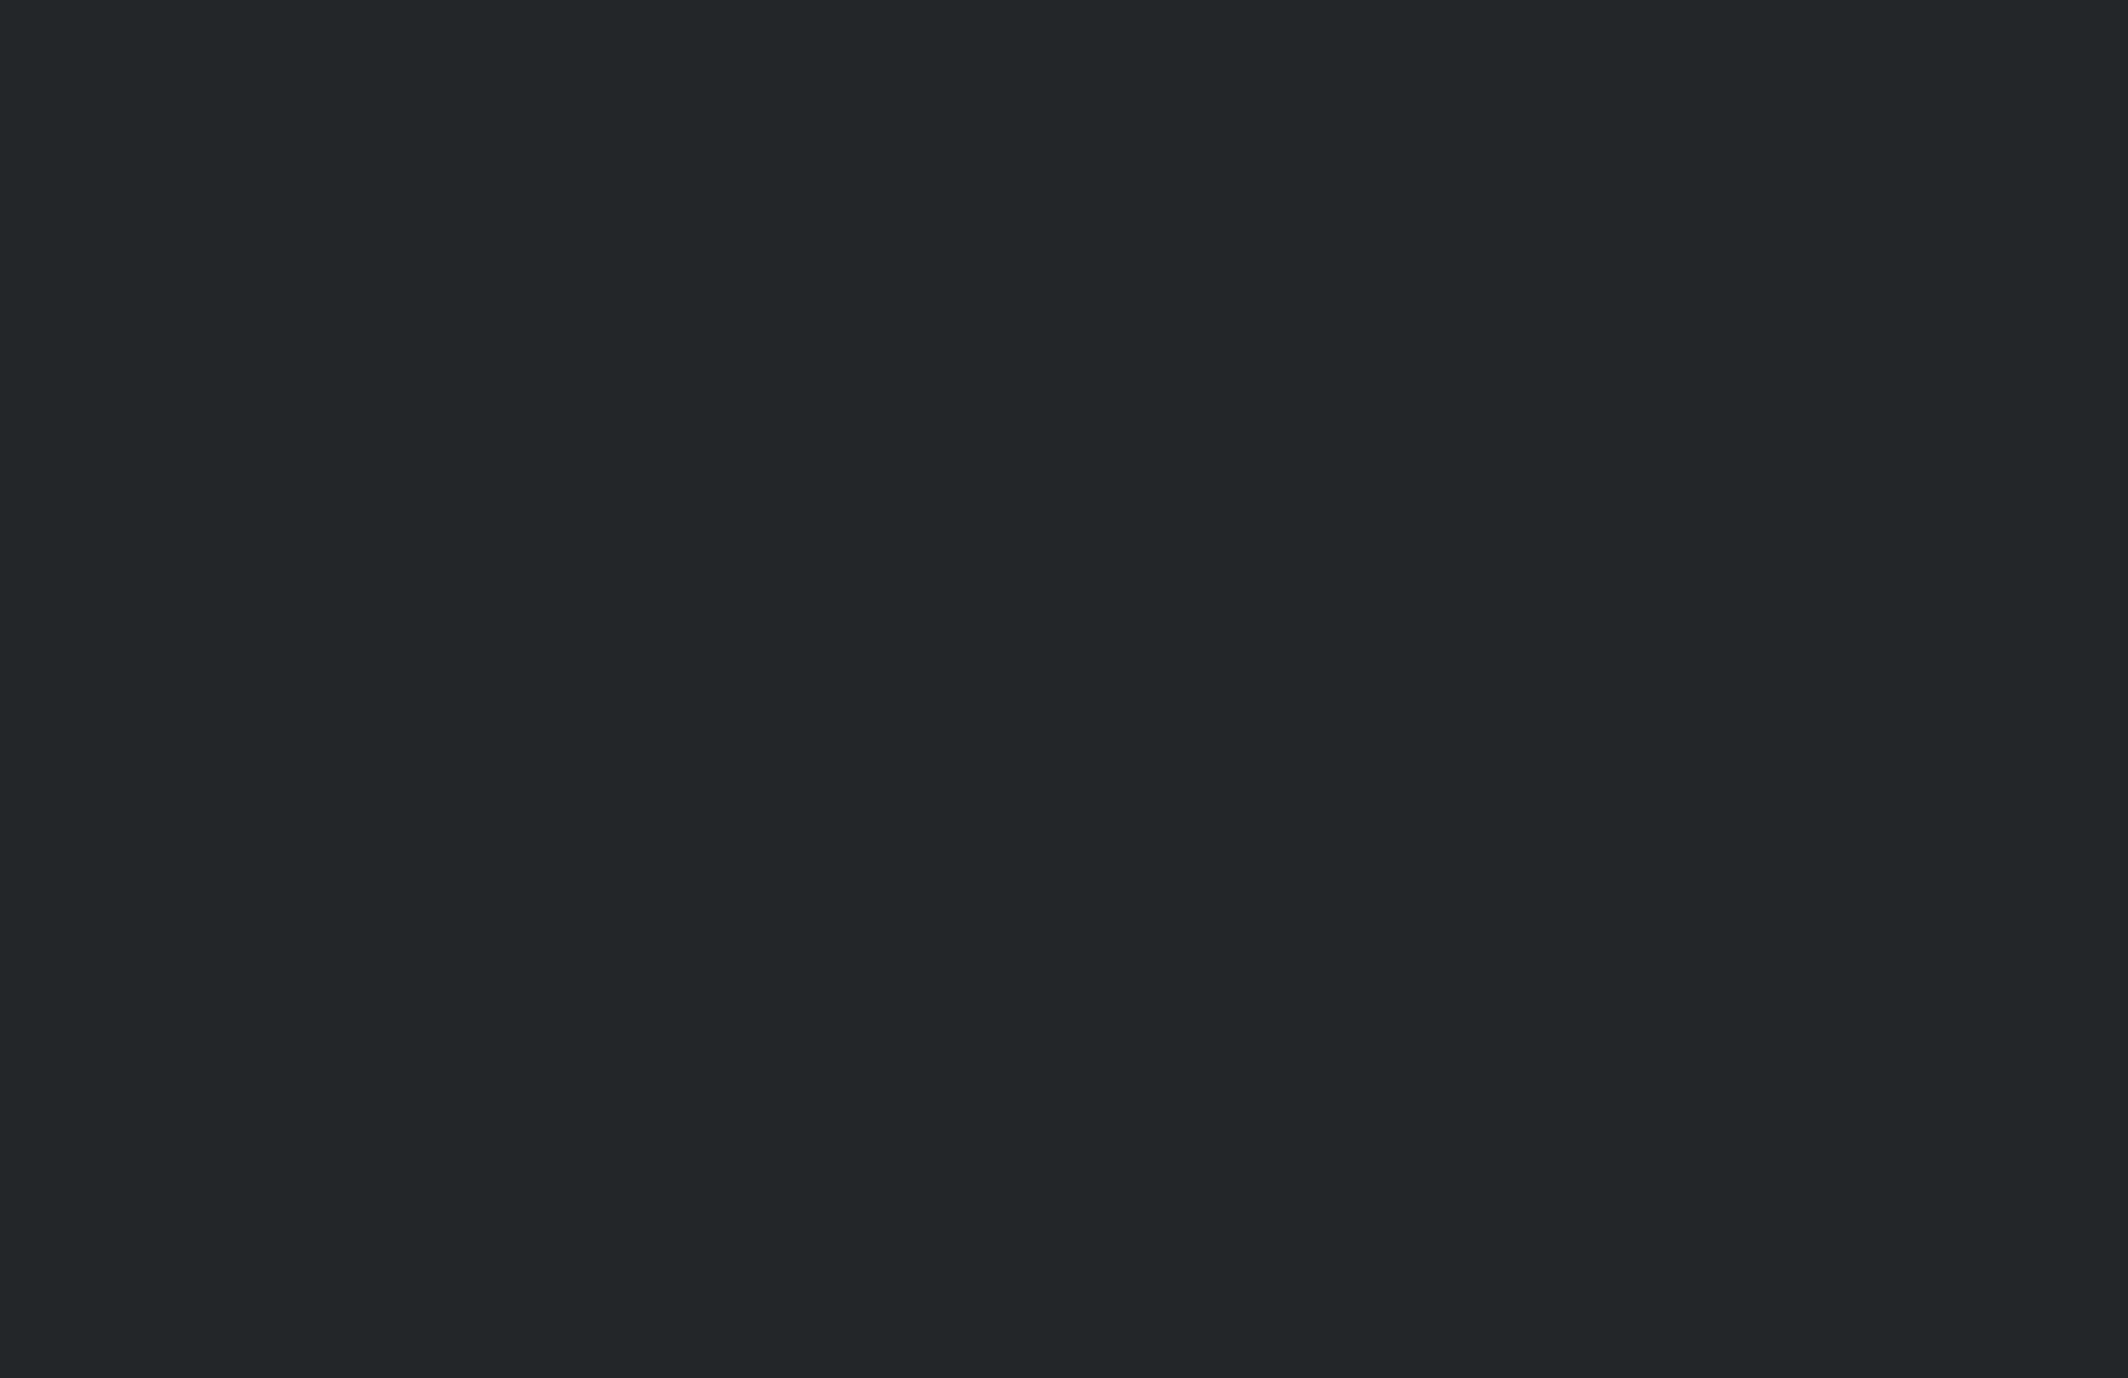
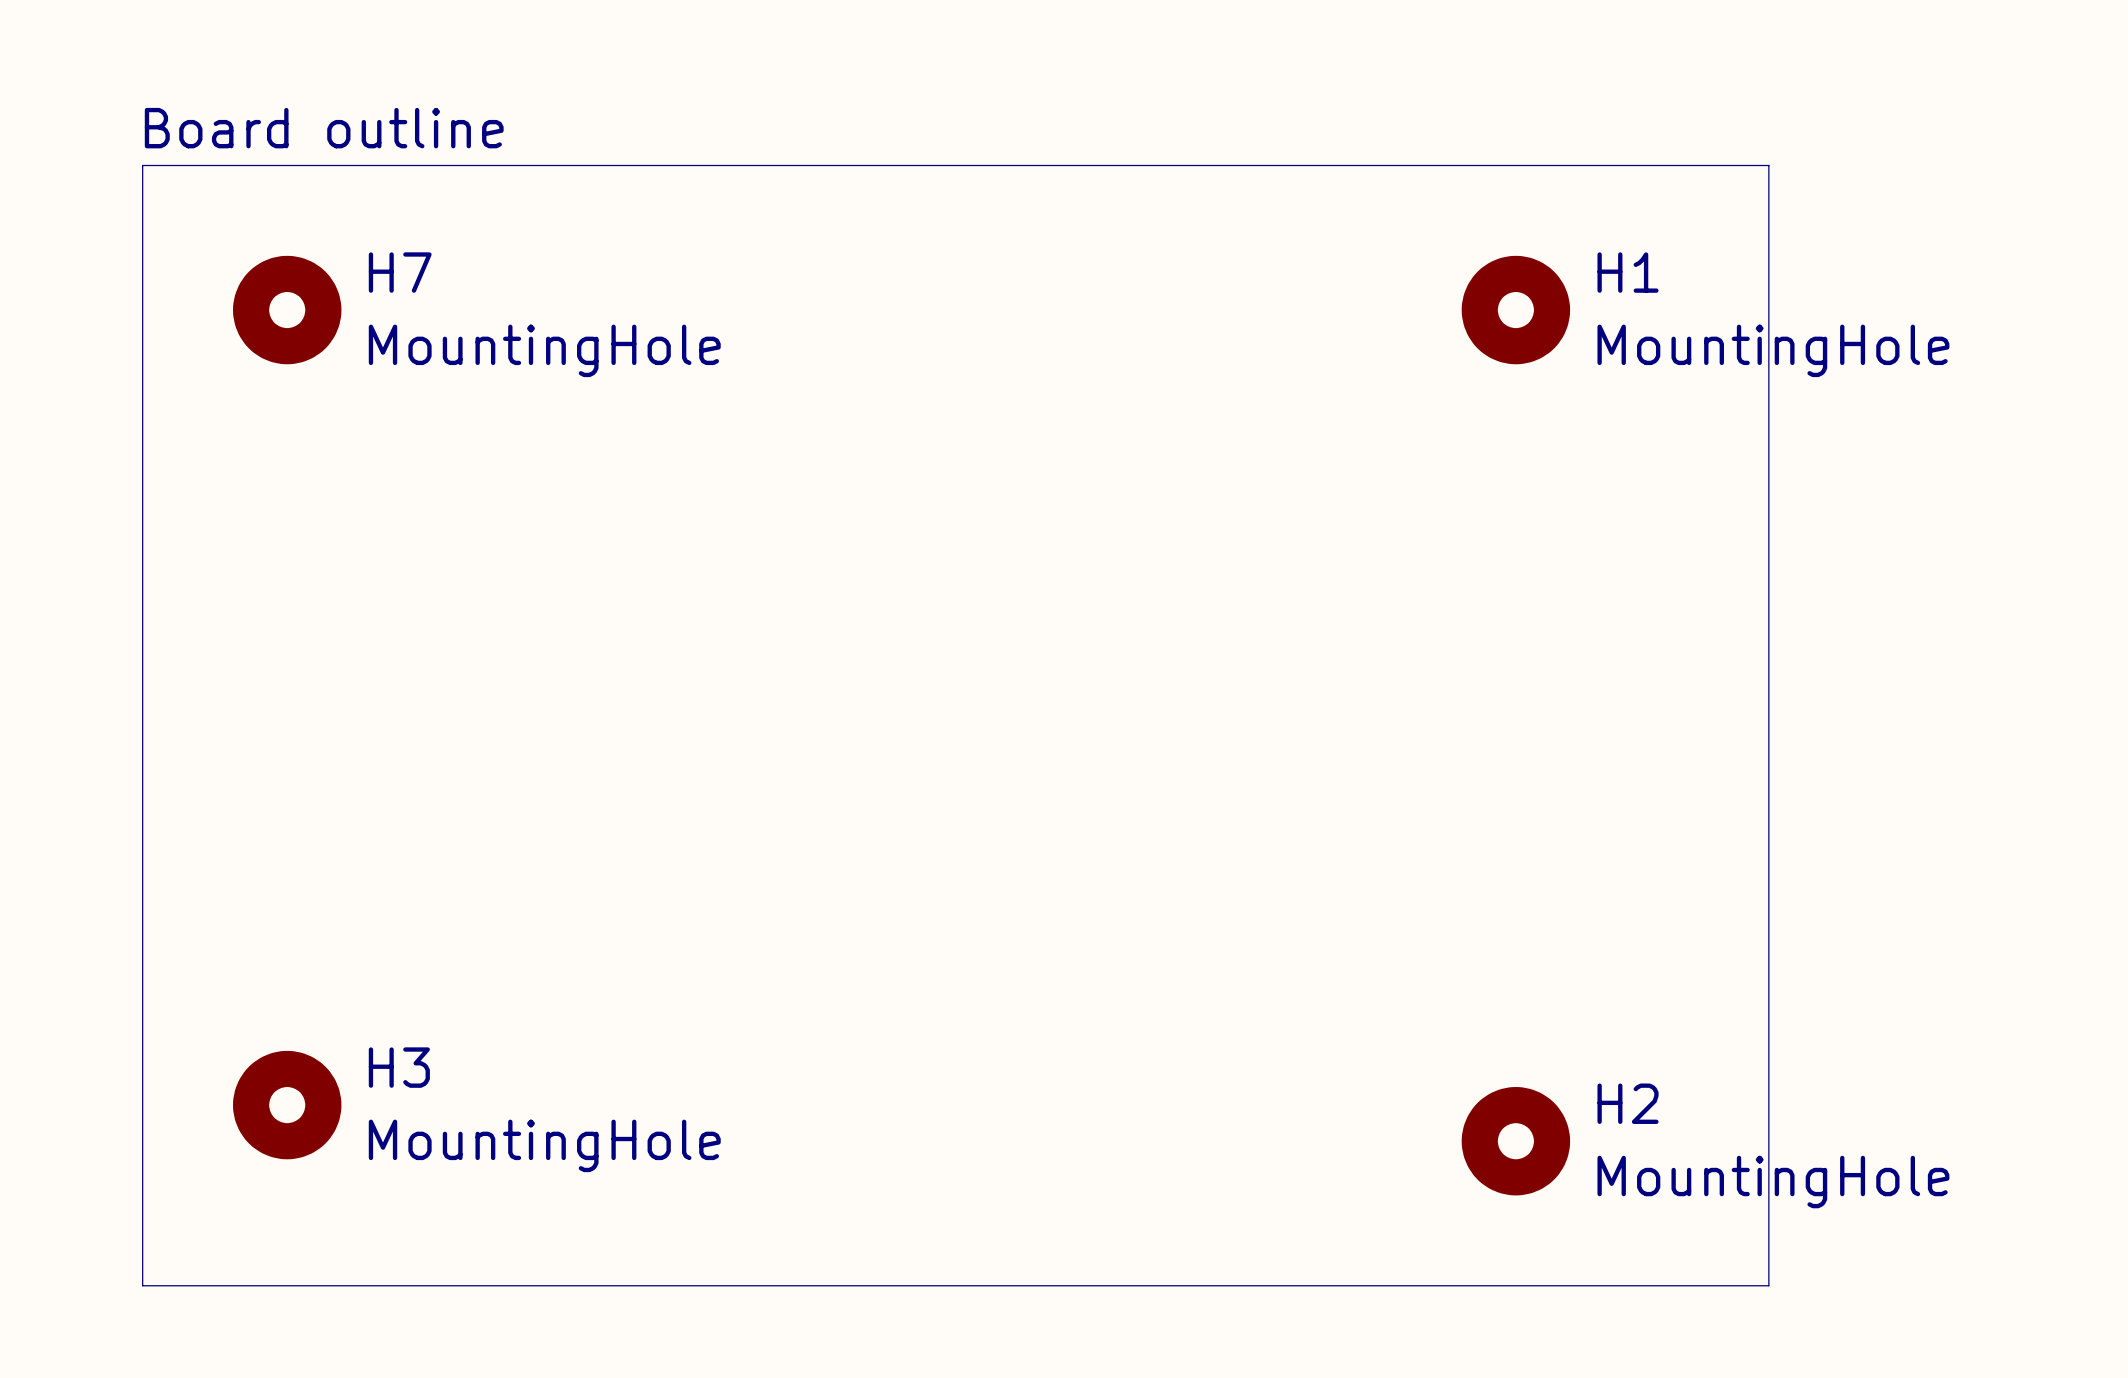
text: none -> Board outline (324, 128)
line: none -> (142, 165) (1768, 165) (1768, 1285) (142, 1285) (142, 165)
H7: none -> MountingHole (287, 310)
H1: none -> MountingHole (1515, 310)
H3: none -> MountingHole (287, 1105)
H2: none -> MountingHole (1515, 1141)

